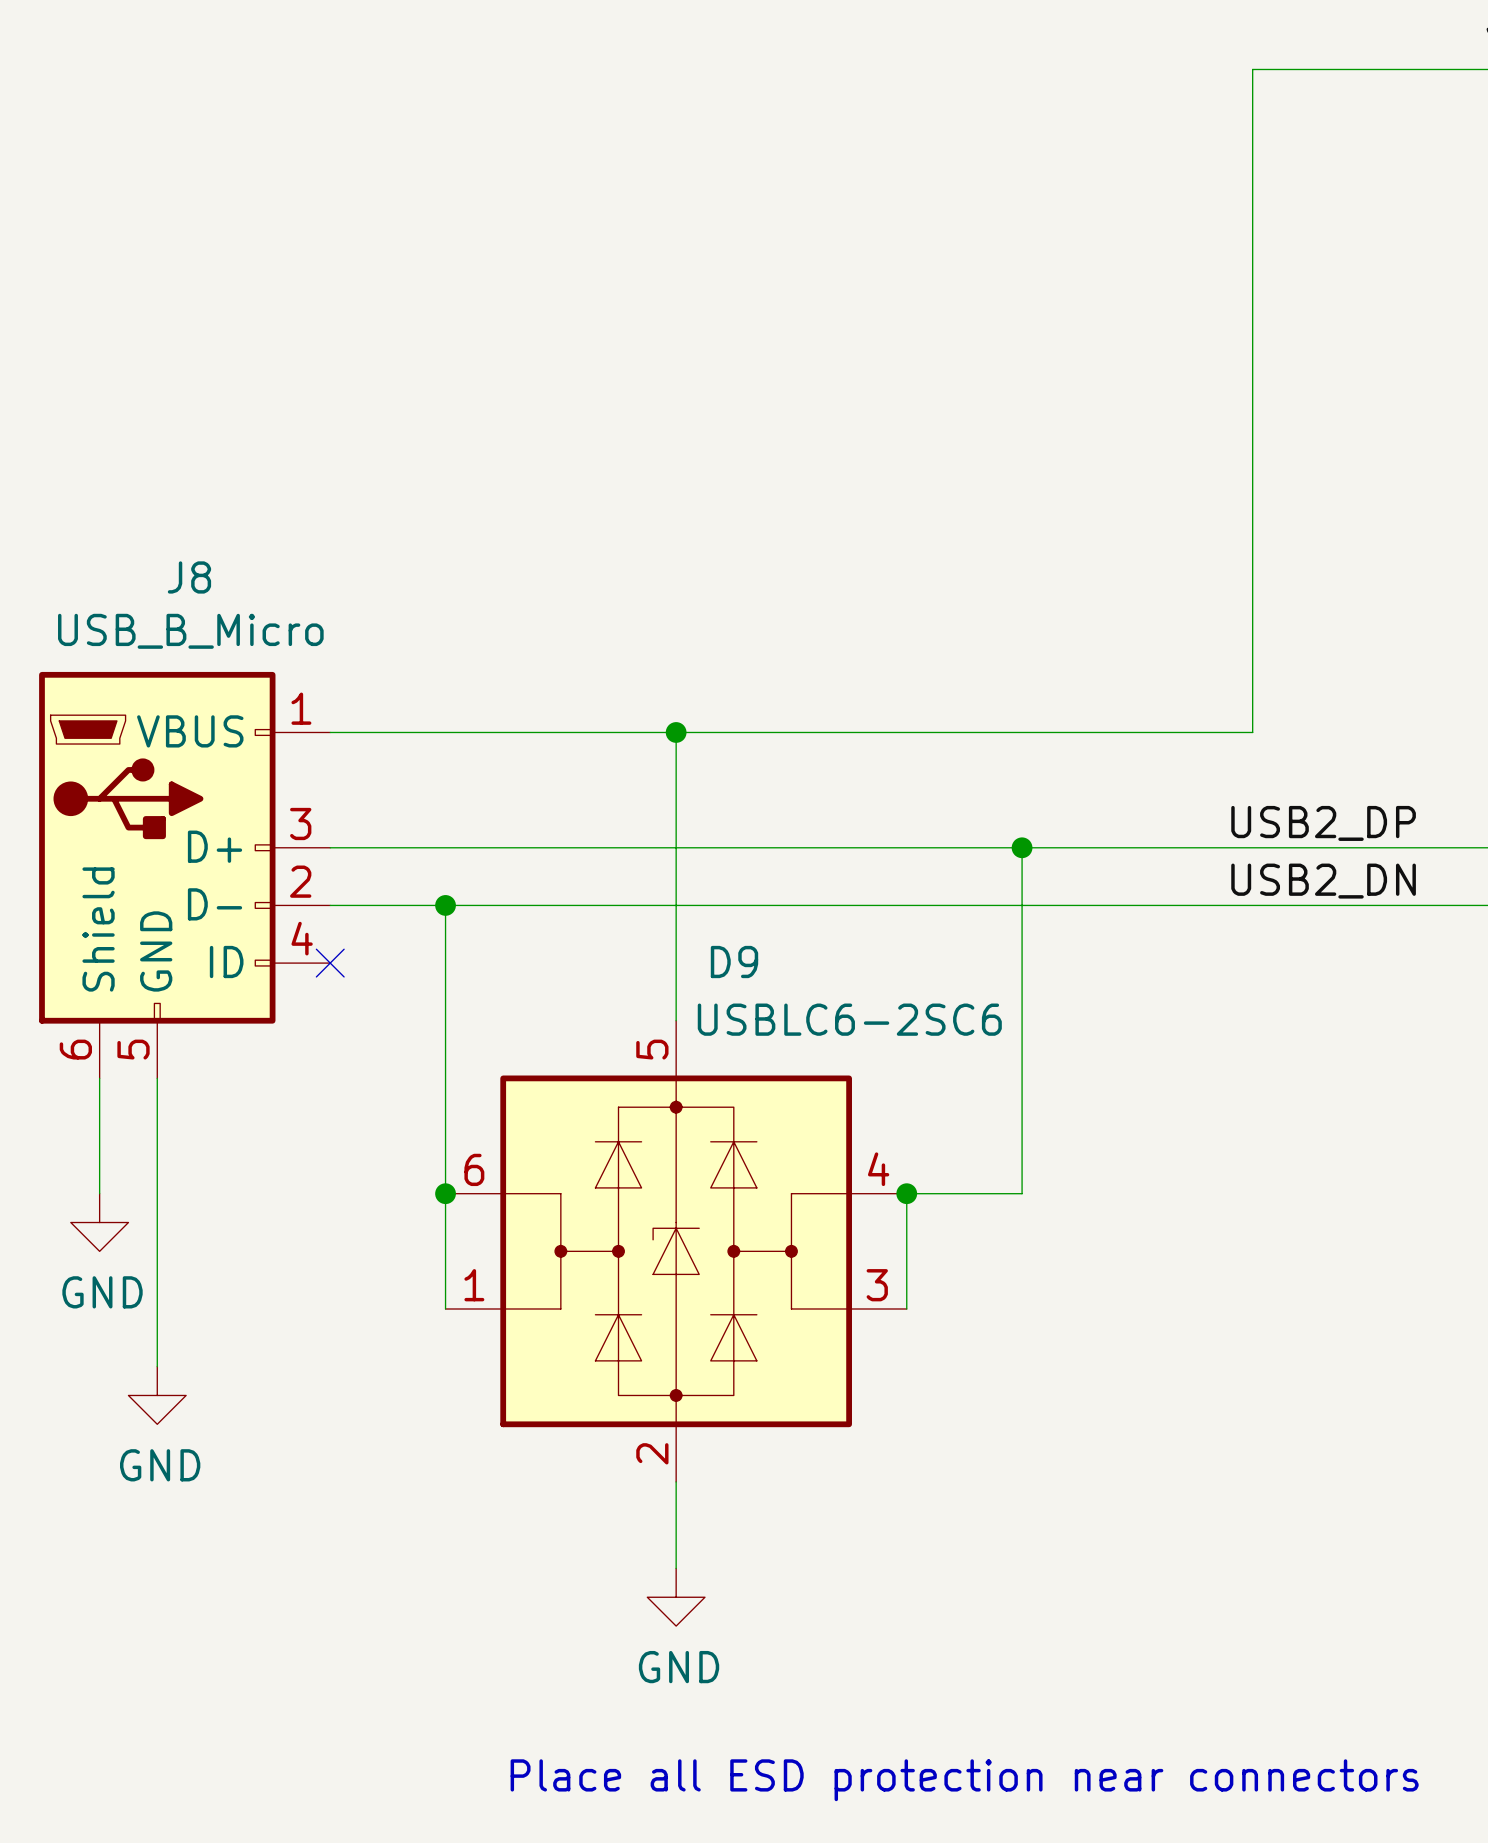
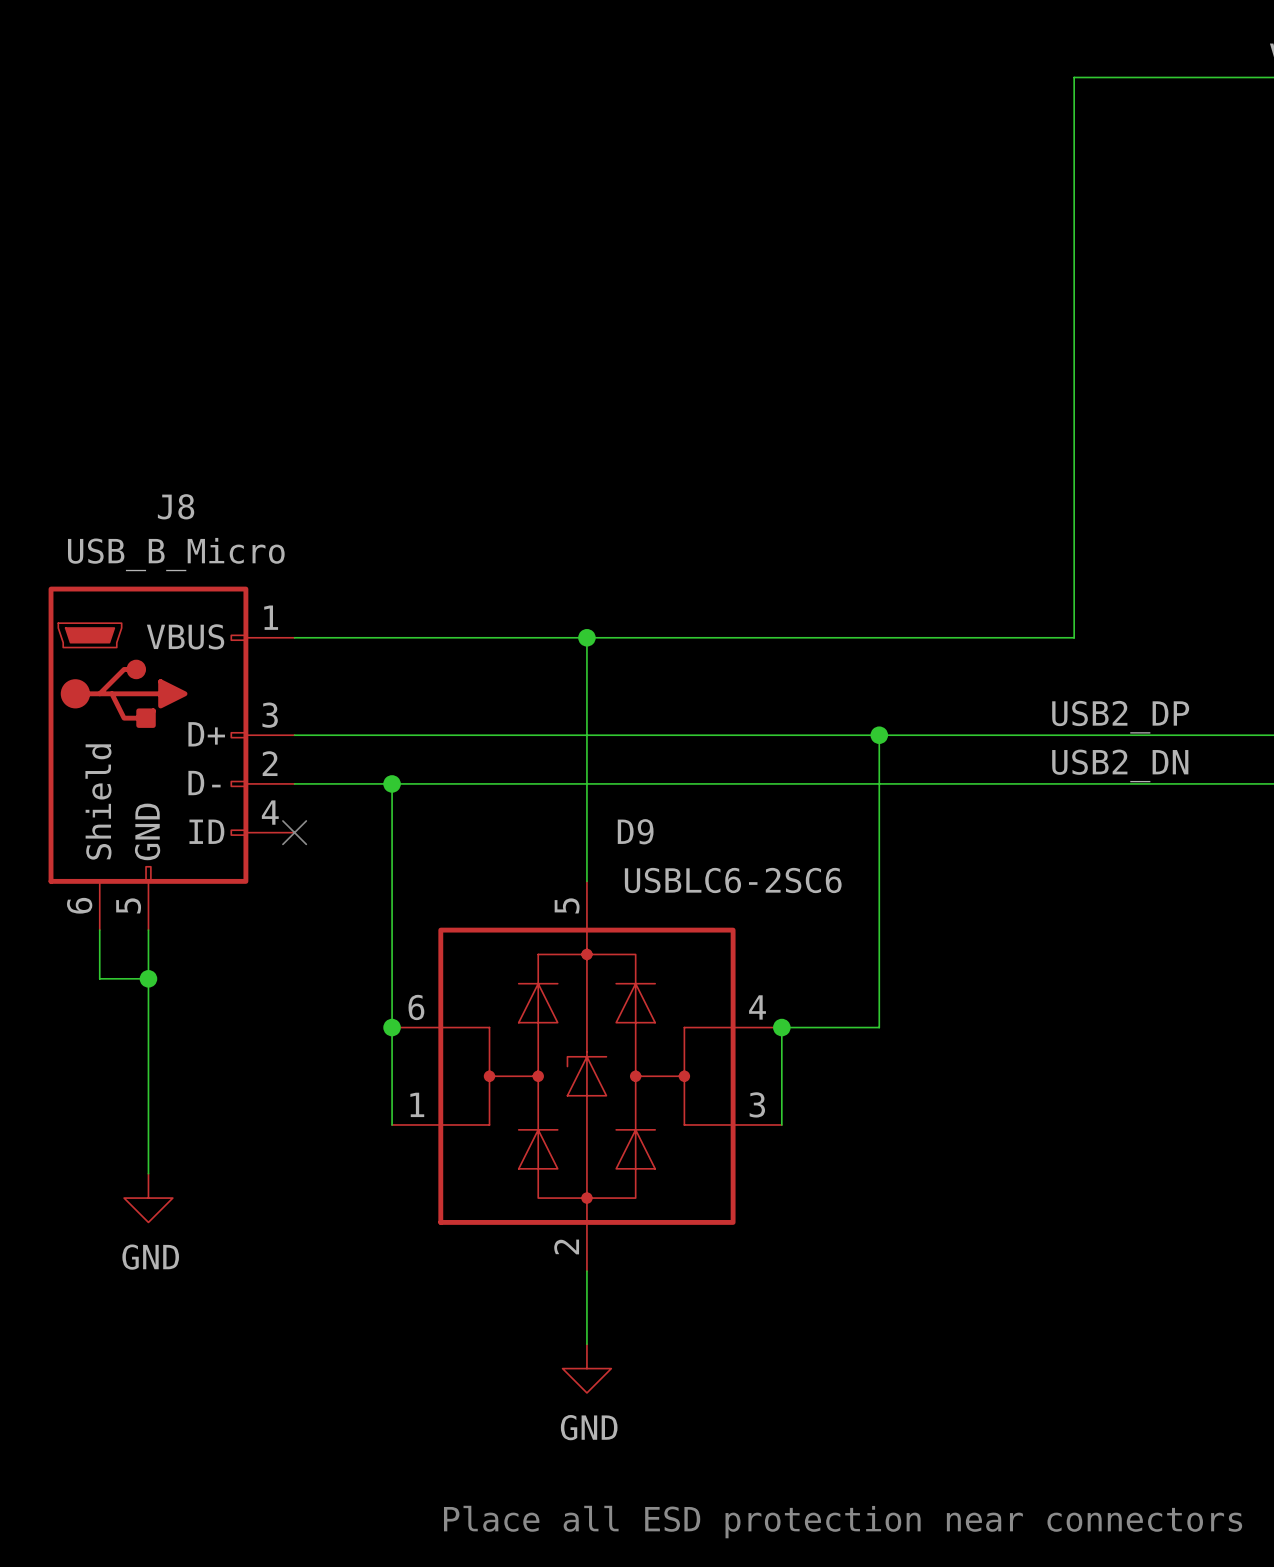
wire: (99, 1136) (99, 1193) -> (99, 978) (148, 978)
junction: none -> (148, 978)
power symbol: GND (99, 1222) -> none

